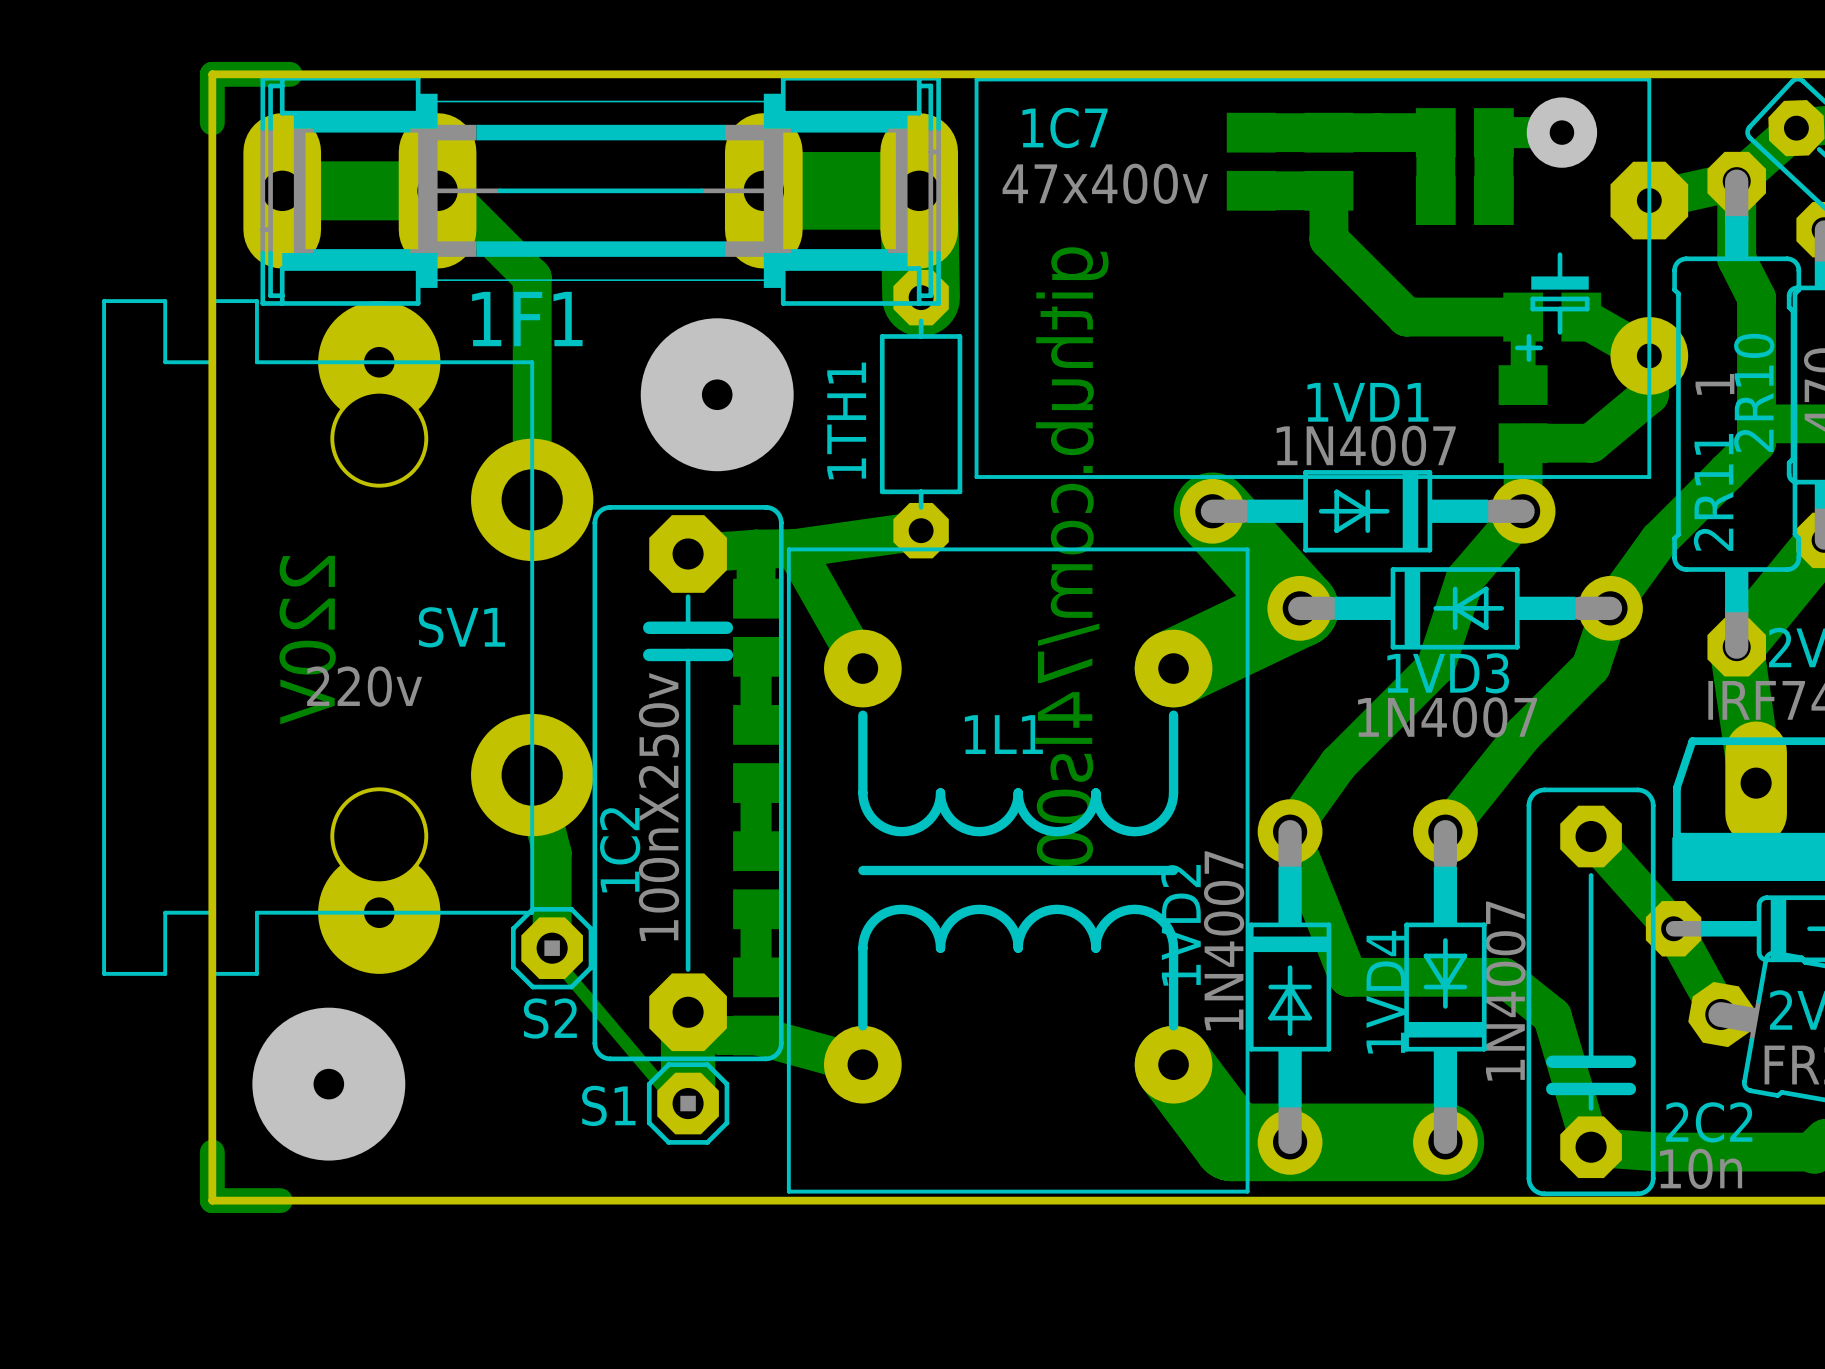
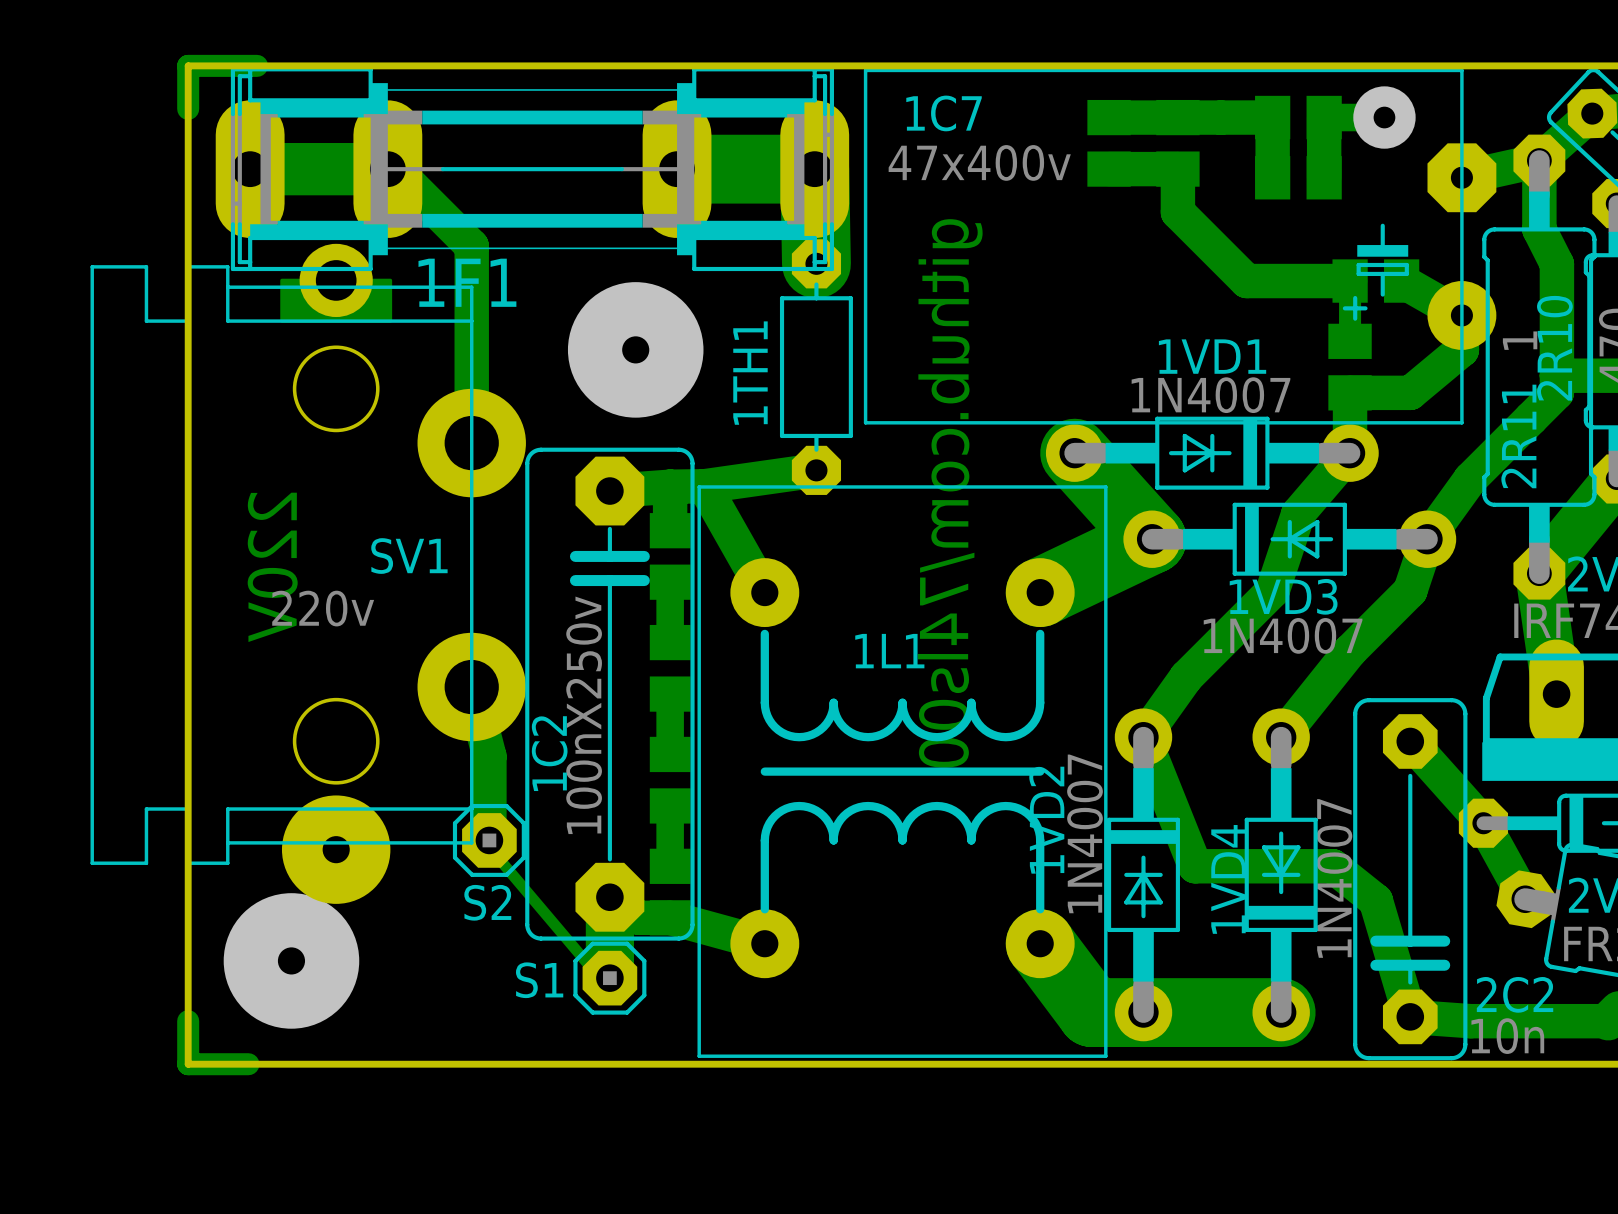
SV1 footprint: [102, 299, 594, 976] -> [90, 243, 526, 904]

